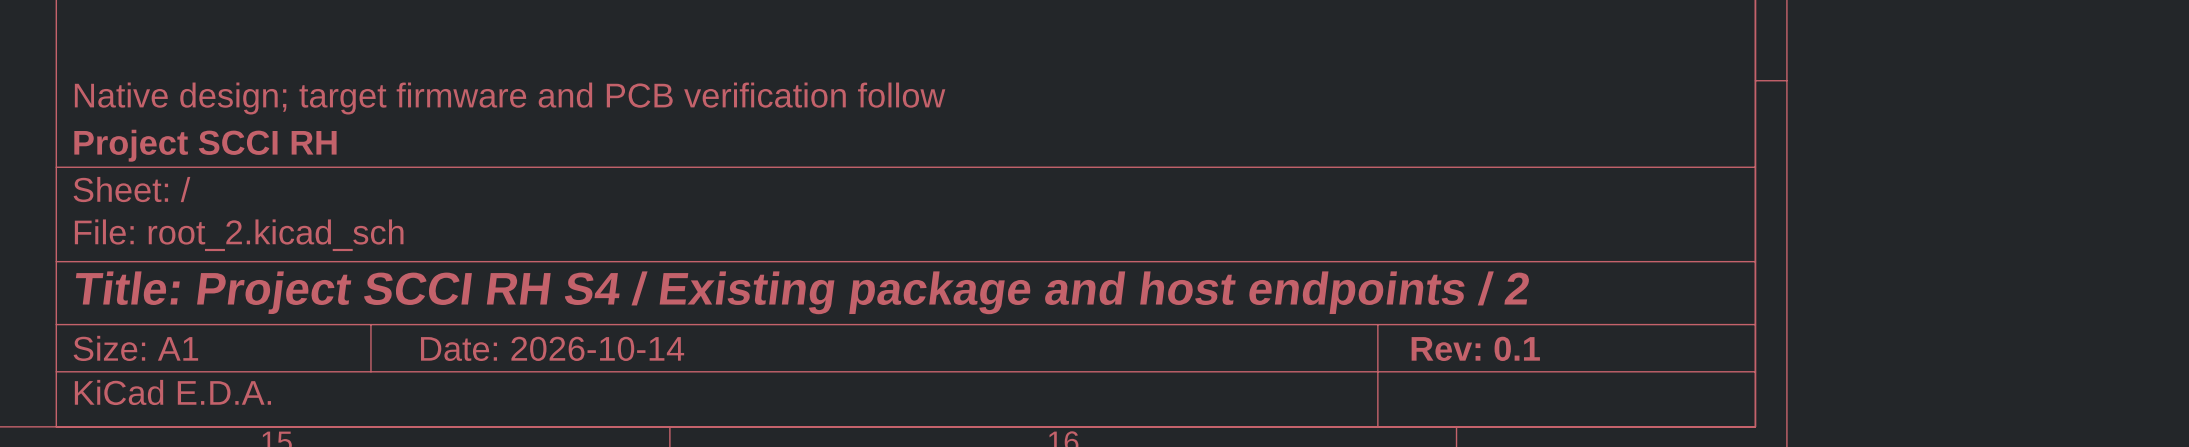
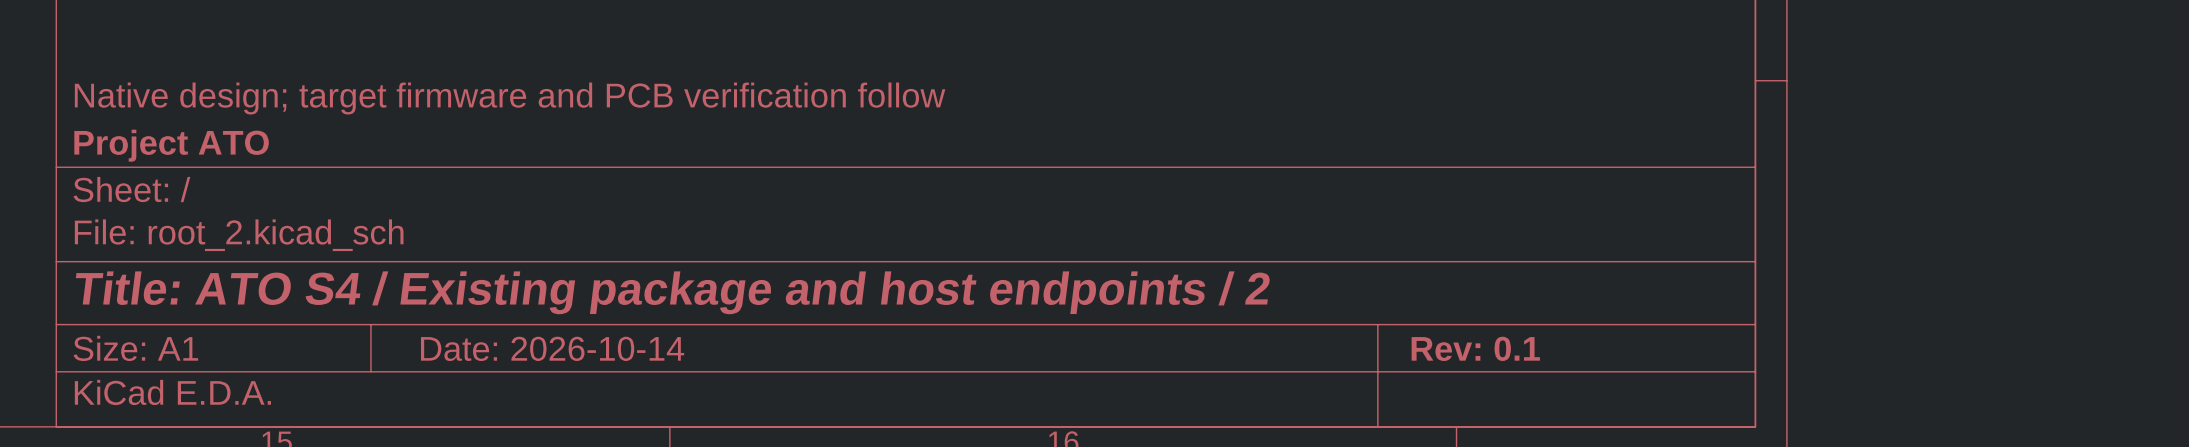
title block: Project SCCI RH (205, 145) -> Project ATO (171, 145)
title block: Title: Project SCCI RH S4 / Existing package and host endpoints / 2 (802, 292) -> Title: ATO S4 / Existing package and host endpoints / 2 (672, 292)

